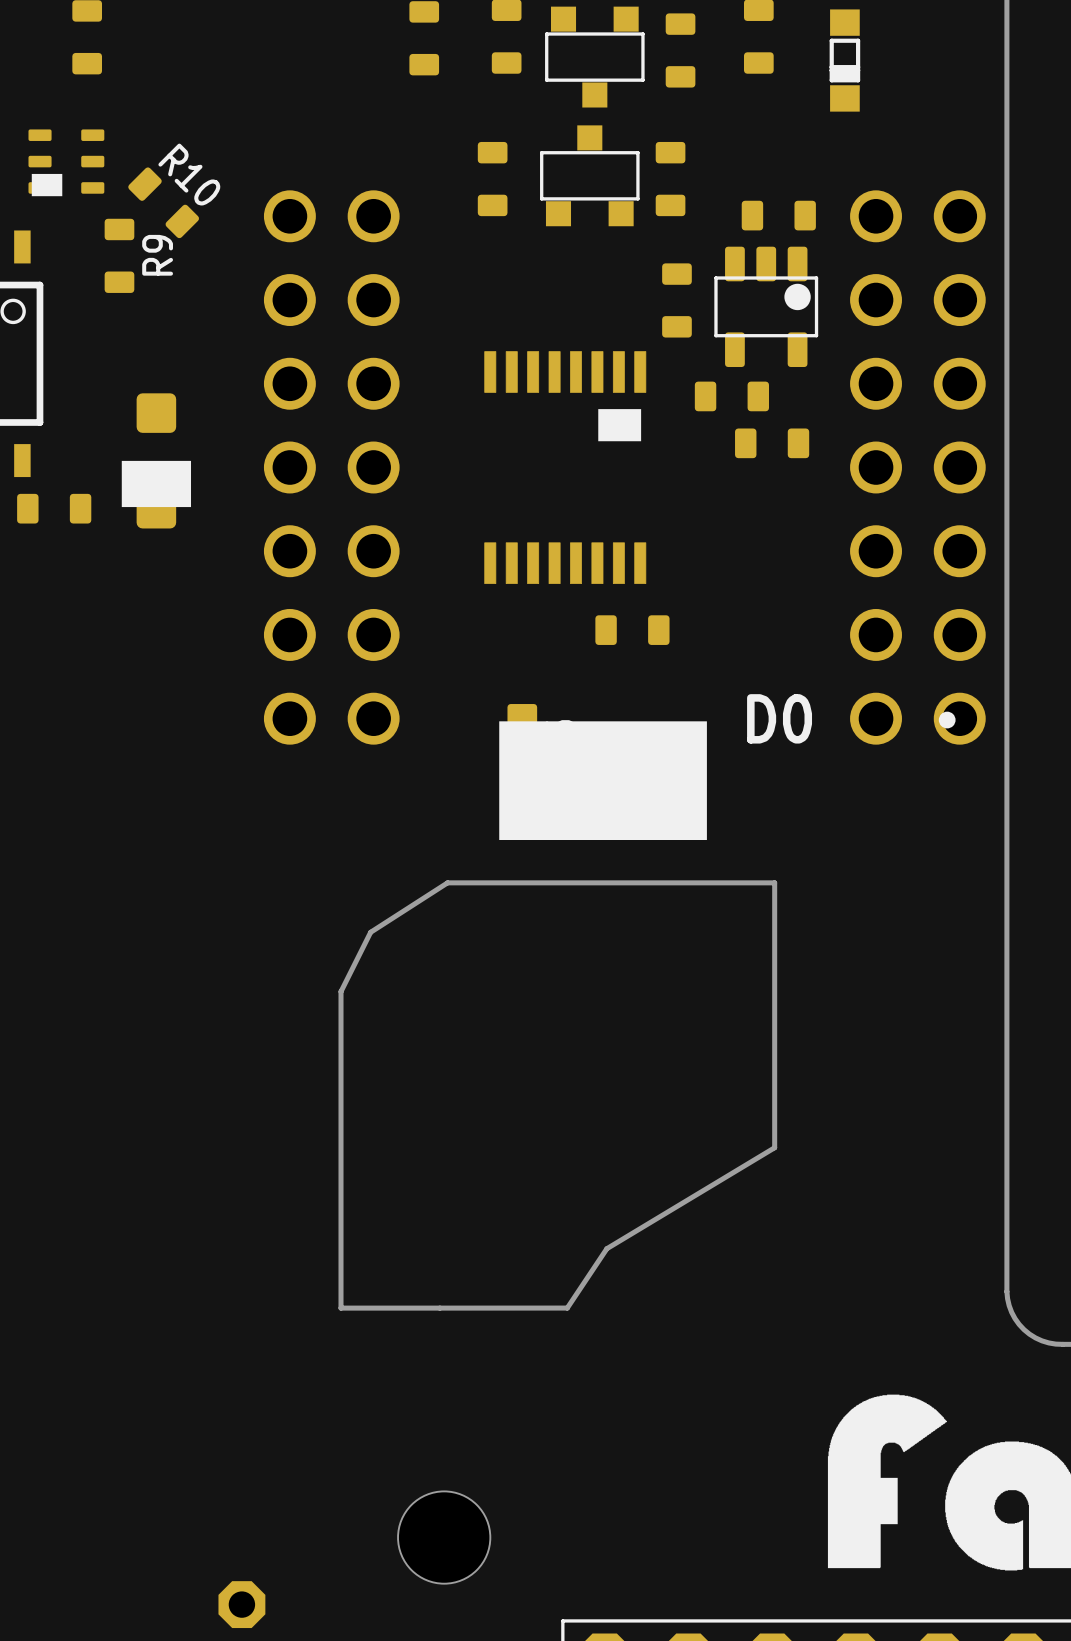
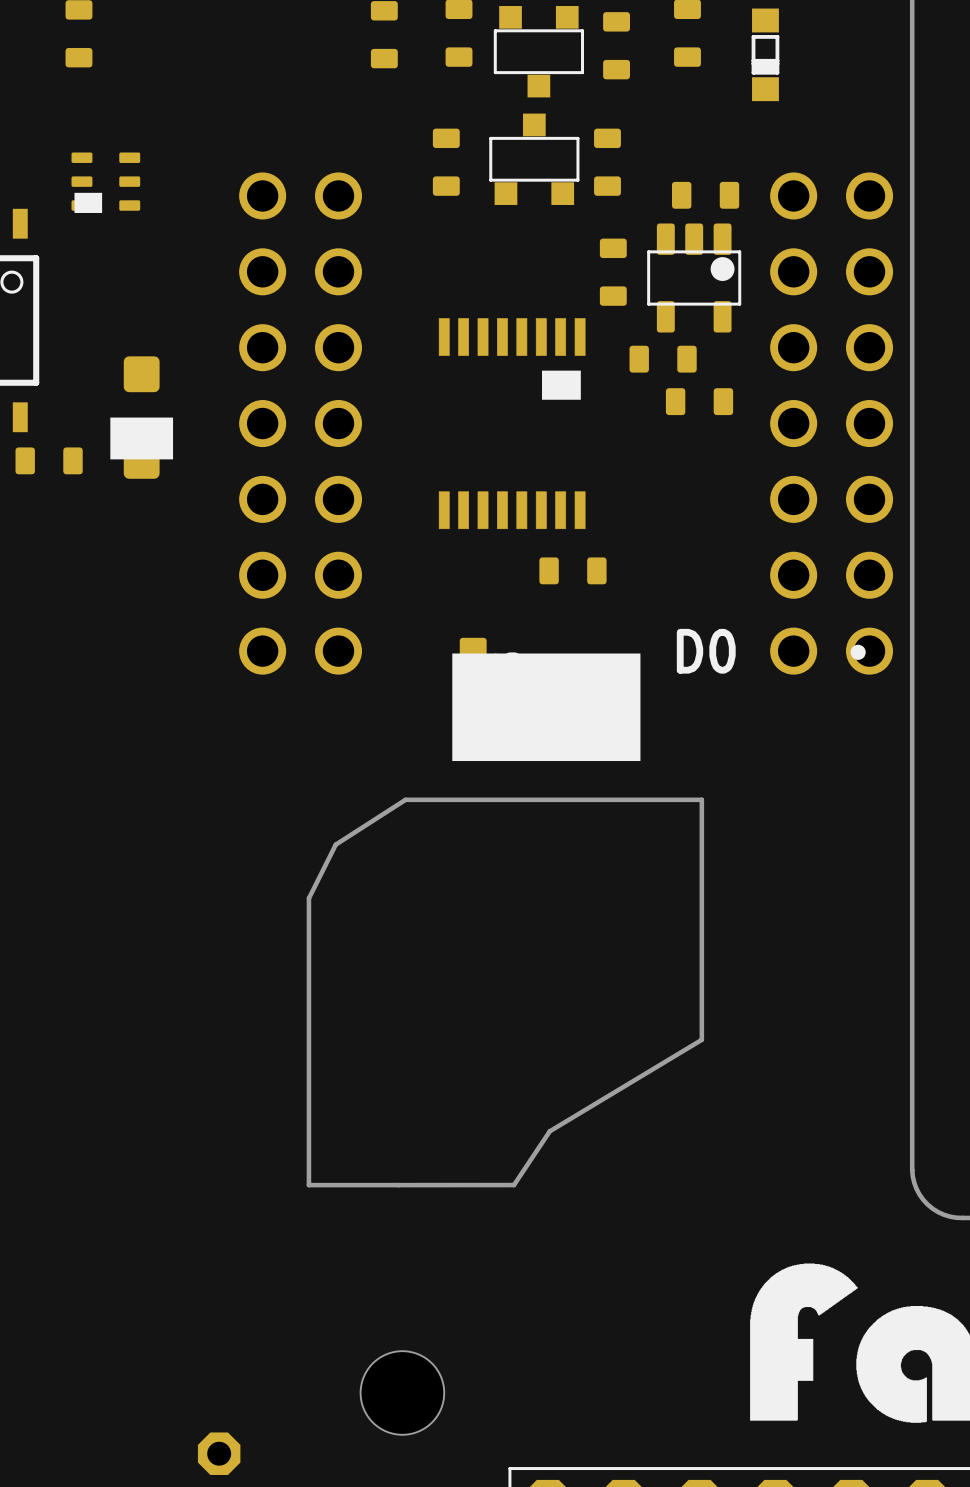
part position: (66, 162) -> (105, 182)
R10: (163, 202) -> none
R9: (119, 255) -> none

